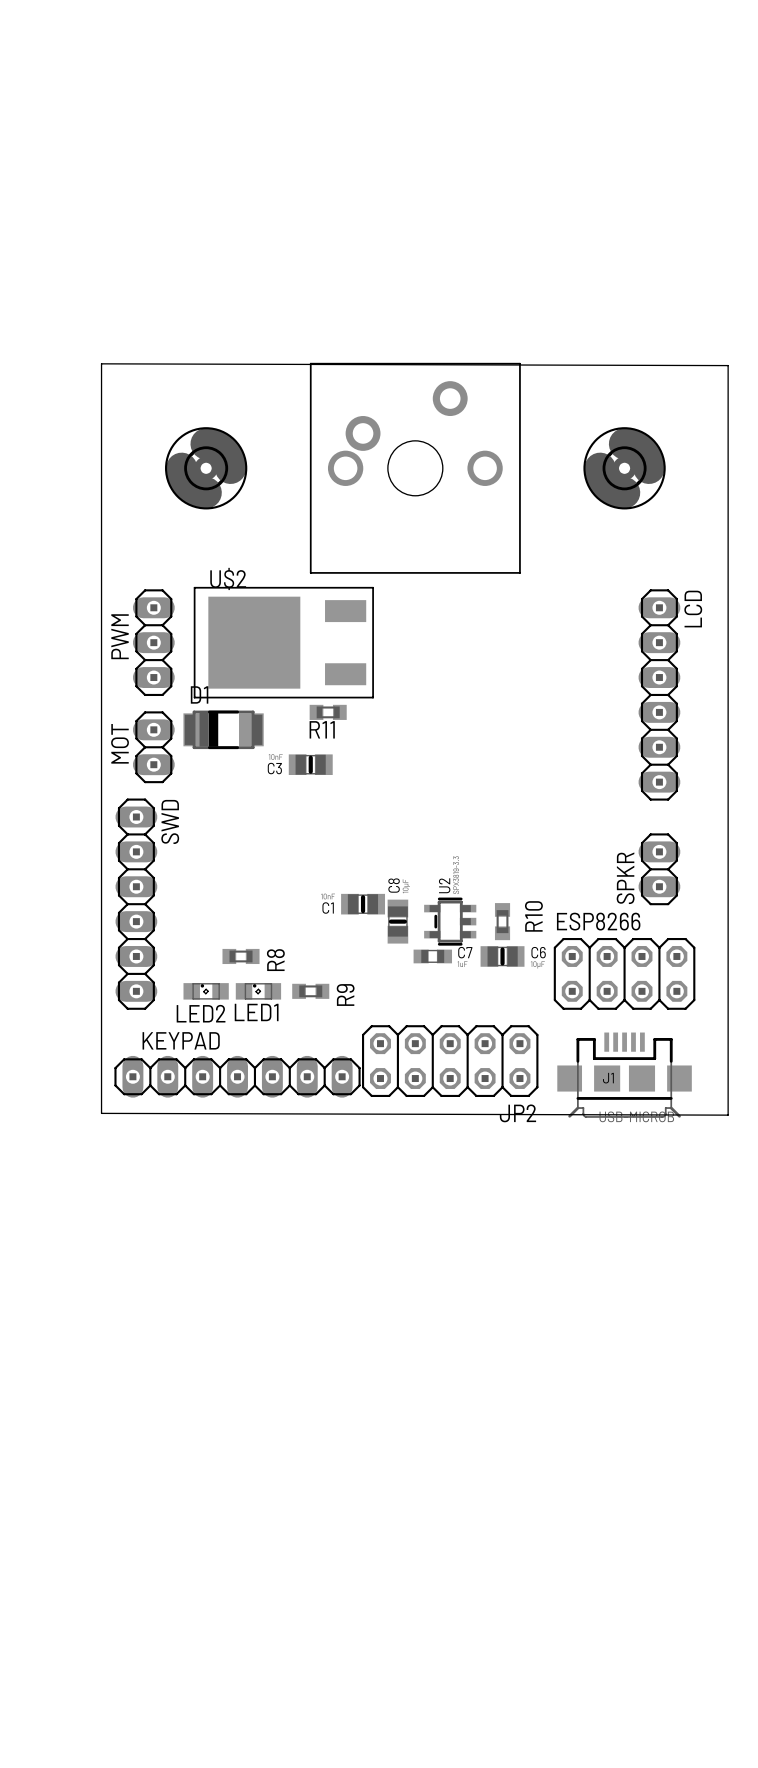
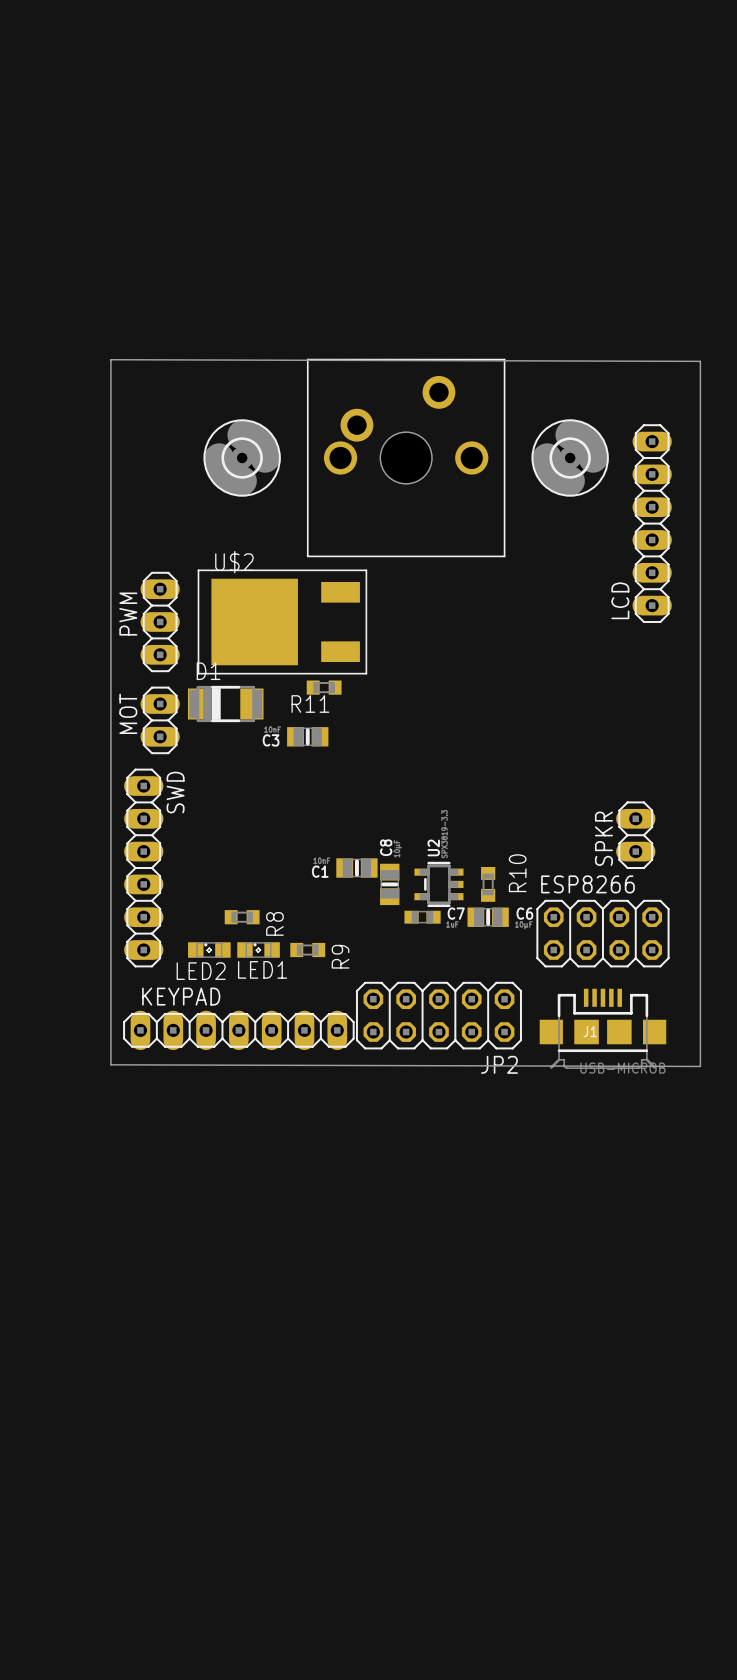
part position: (206, 468) -> (242, 457)
part position: (624, 468) -> (570, 457)
LCD name position: LCD (693, 609) -> LCD (620, 600)
LCD position: (659, 694) -> (652, 523)

